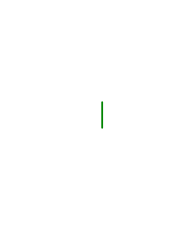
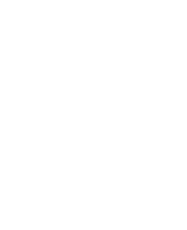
wire: (102, 102) (102, 127) -> none

